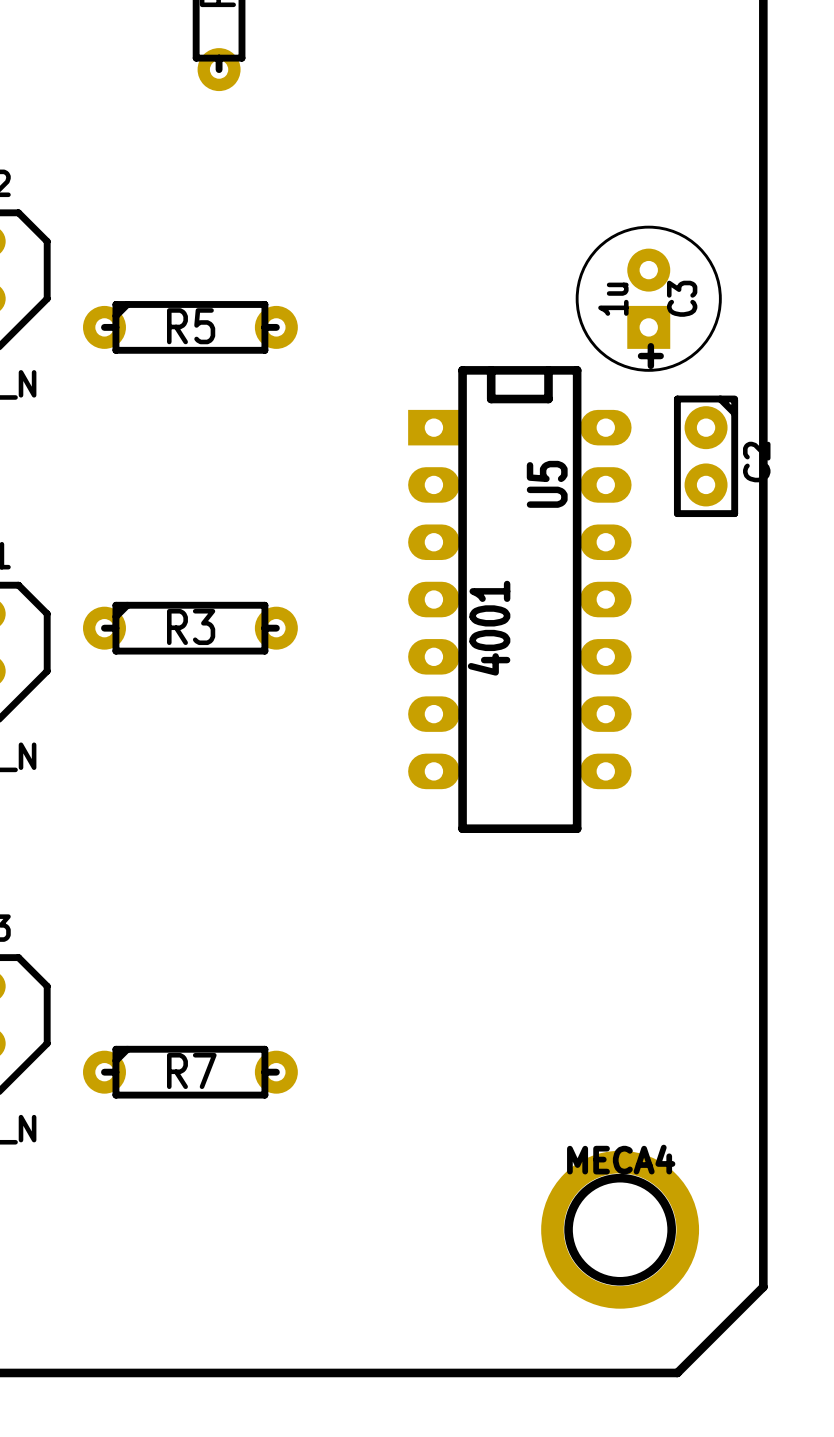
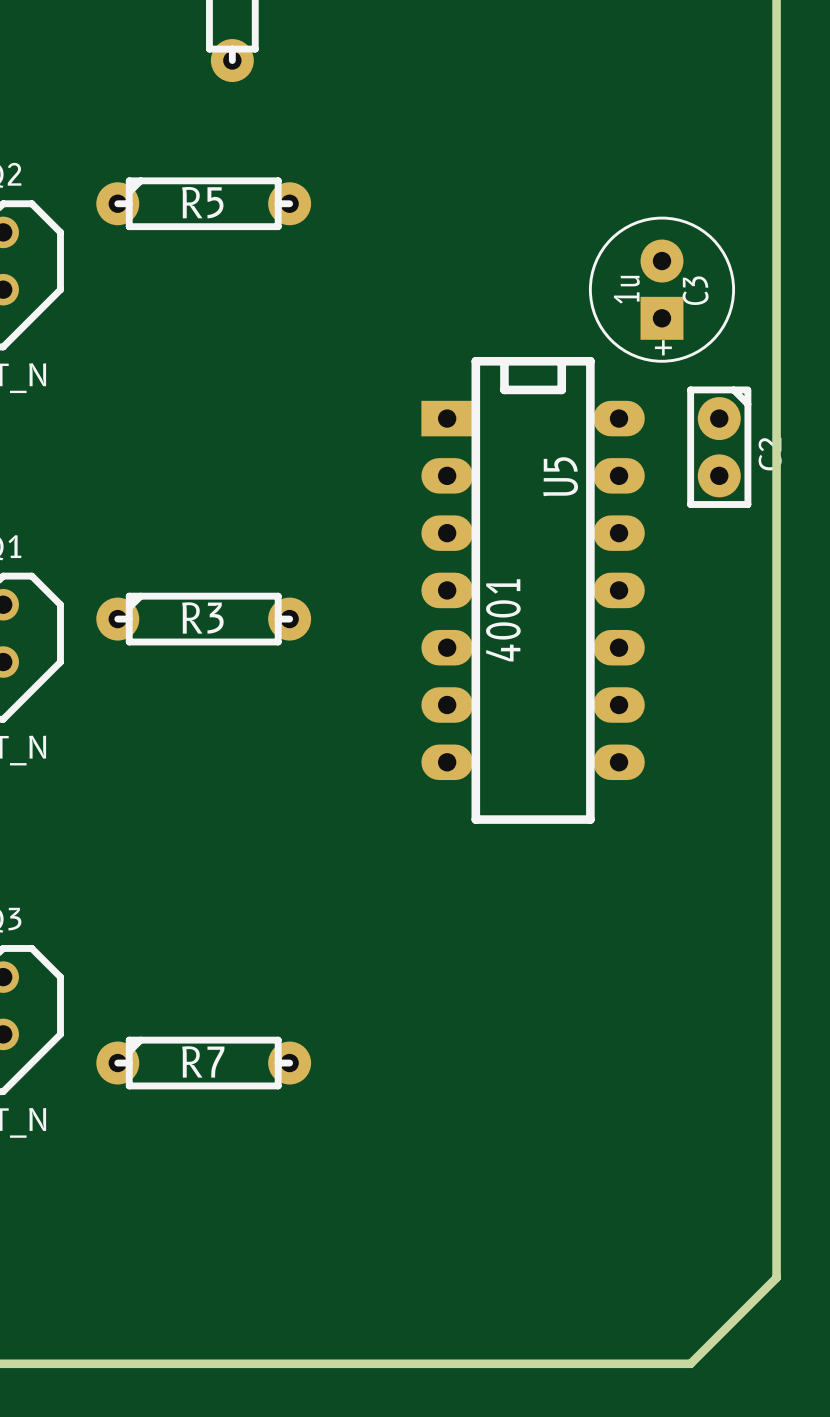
R5 position: (190, 327) -> (203, 203)
MECA4: (620, 1229) -> none

